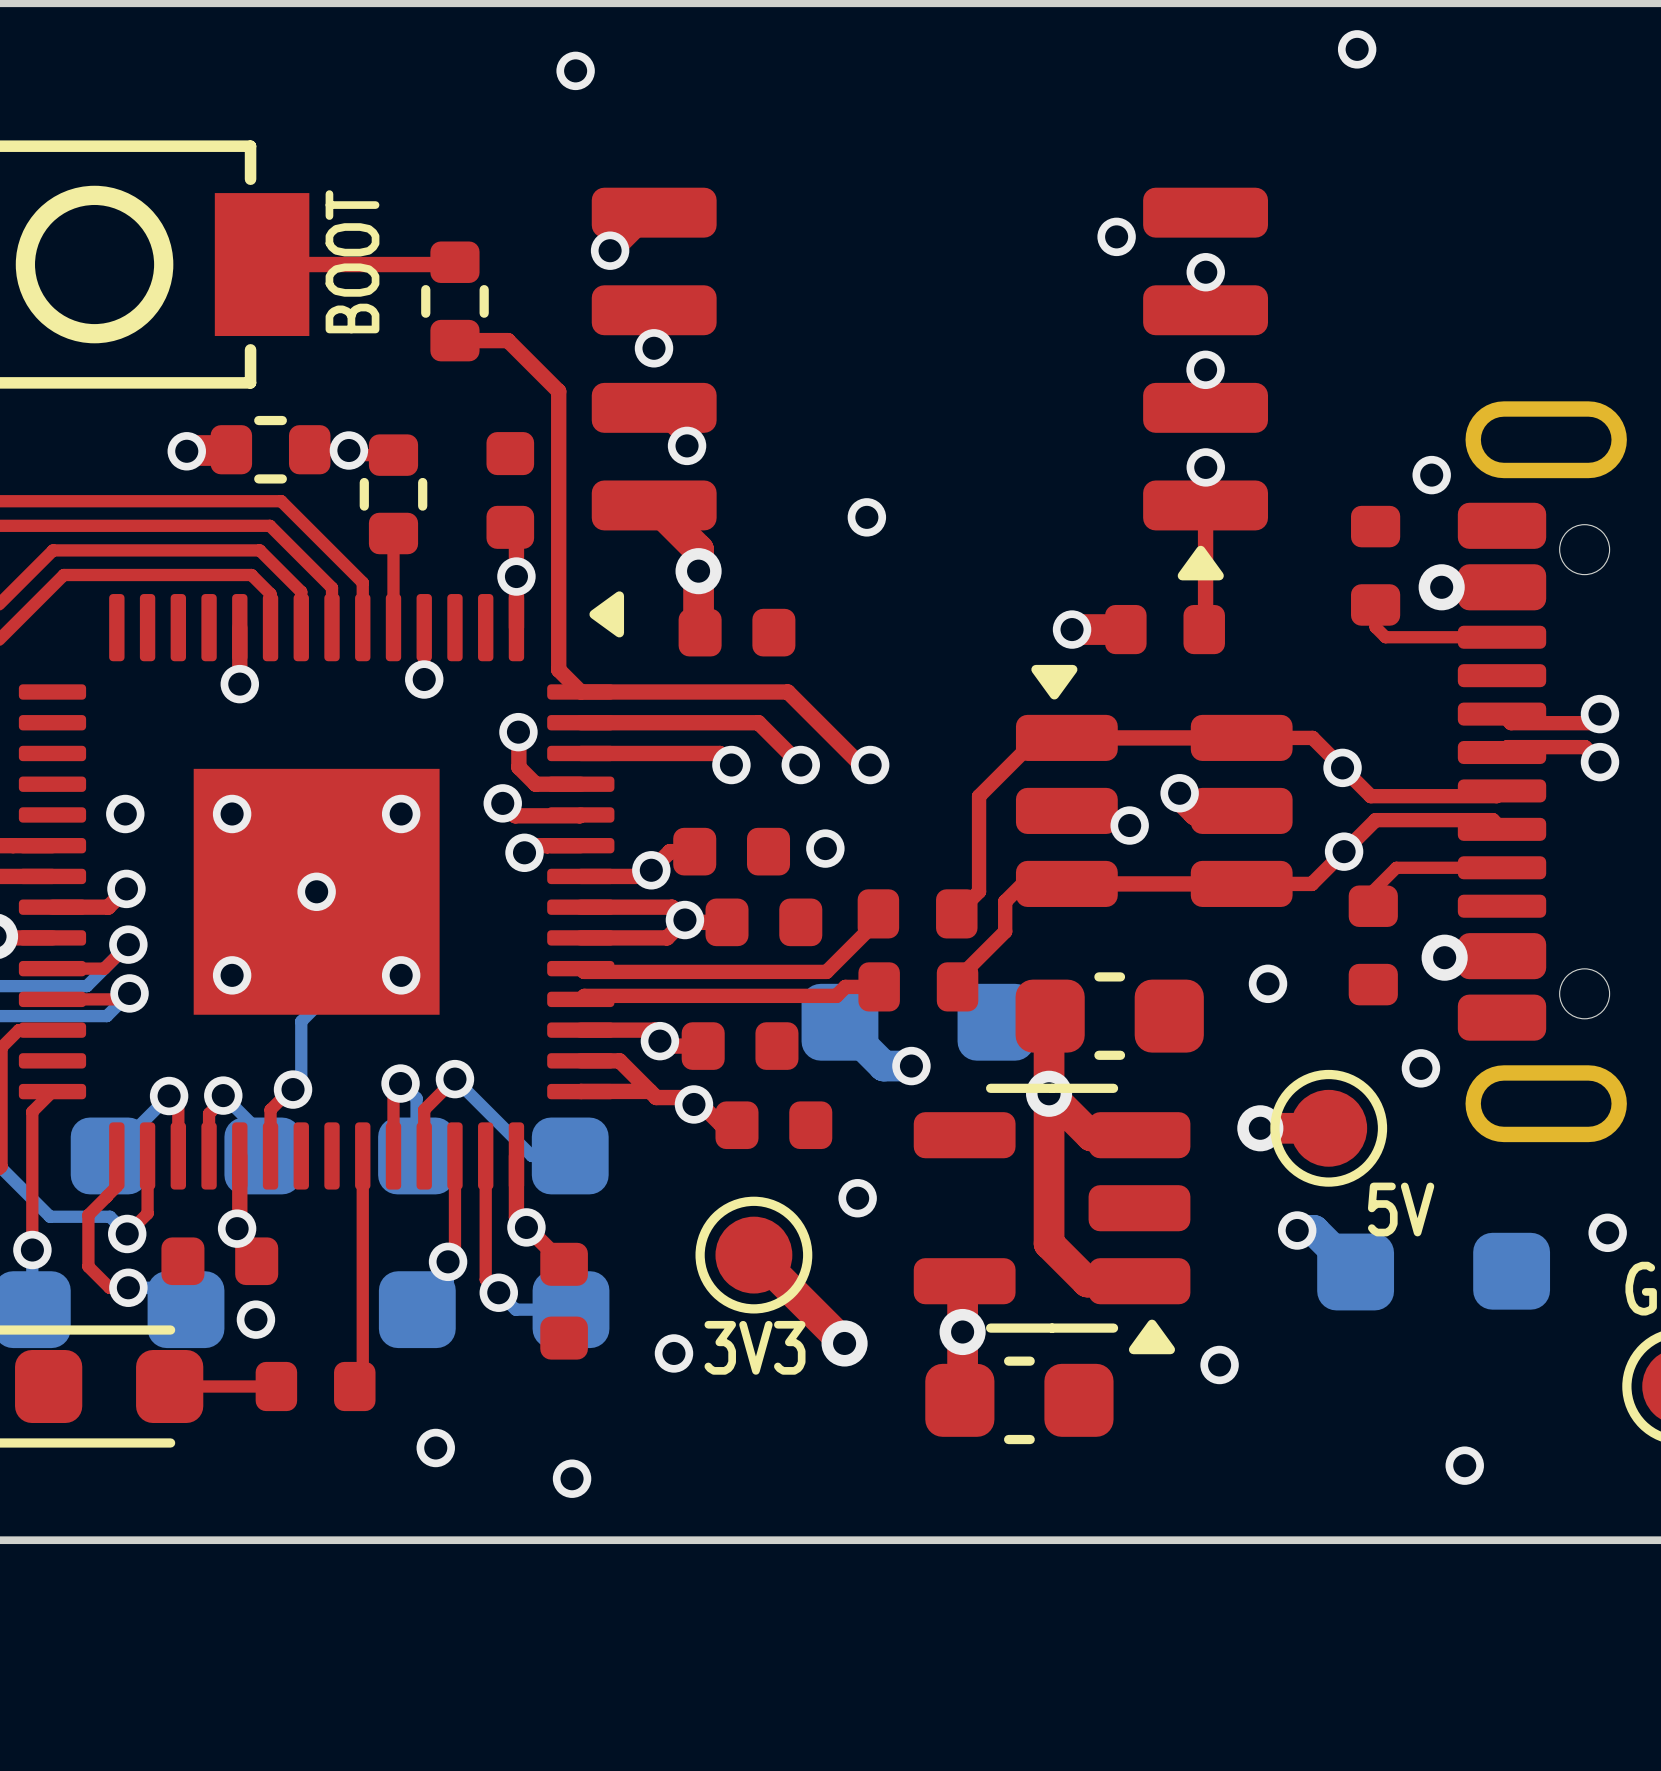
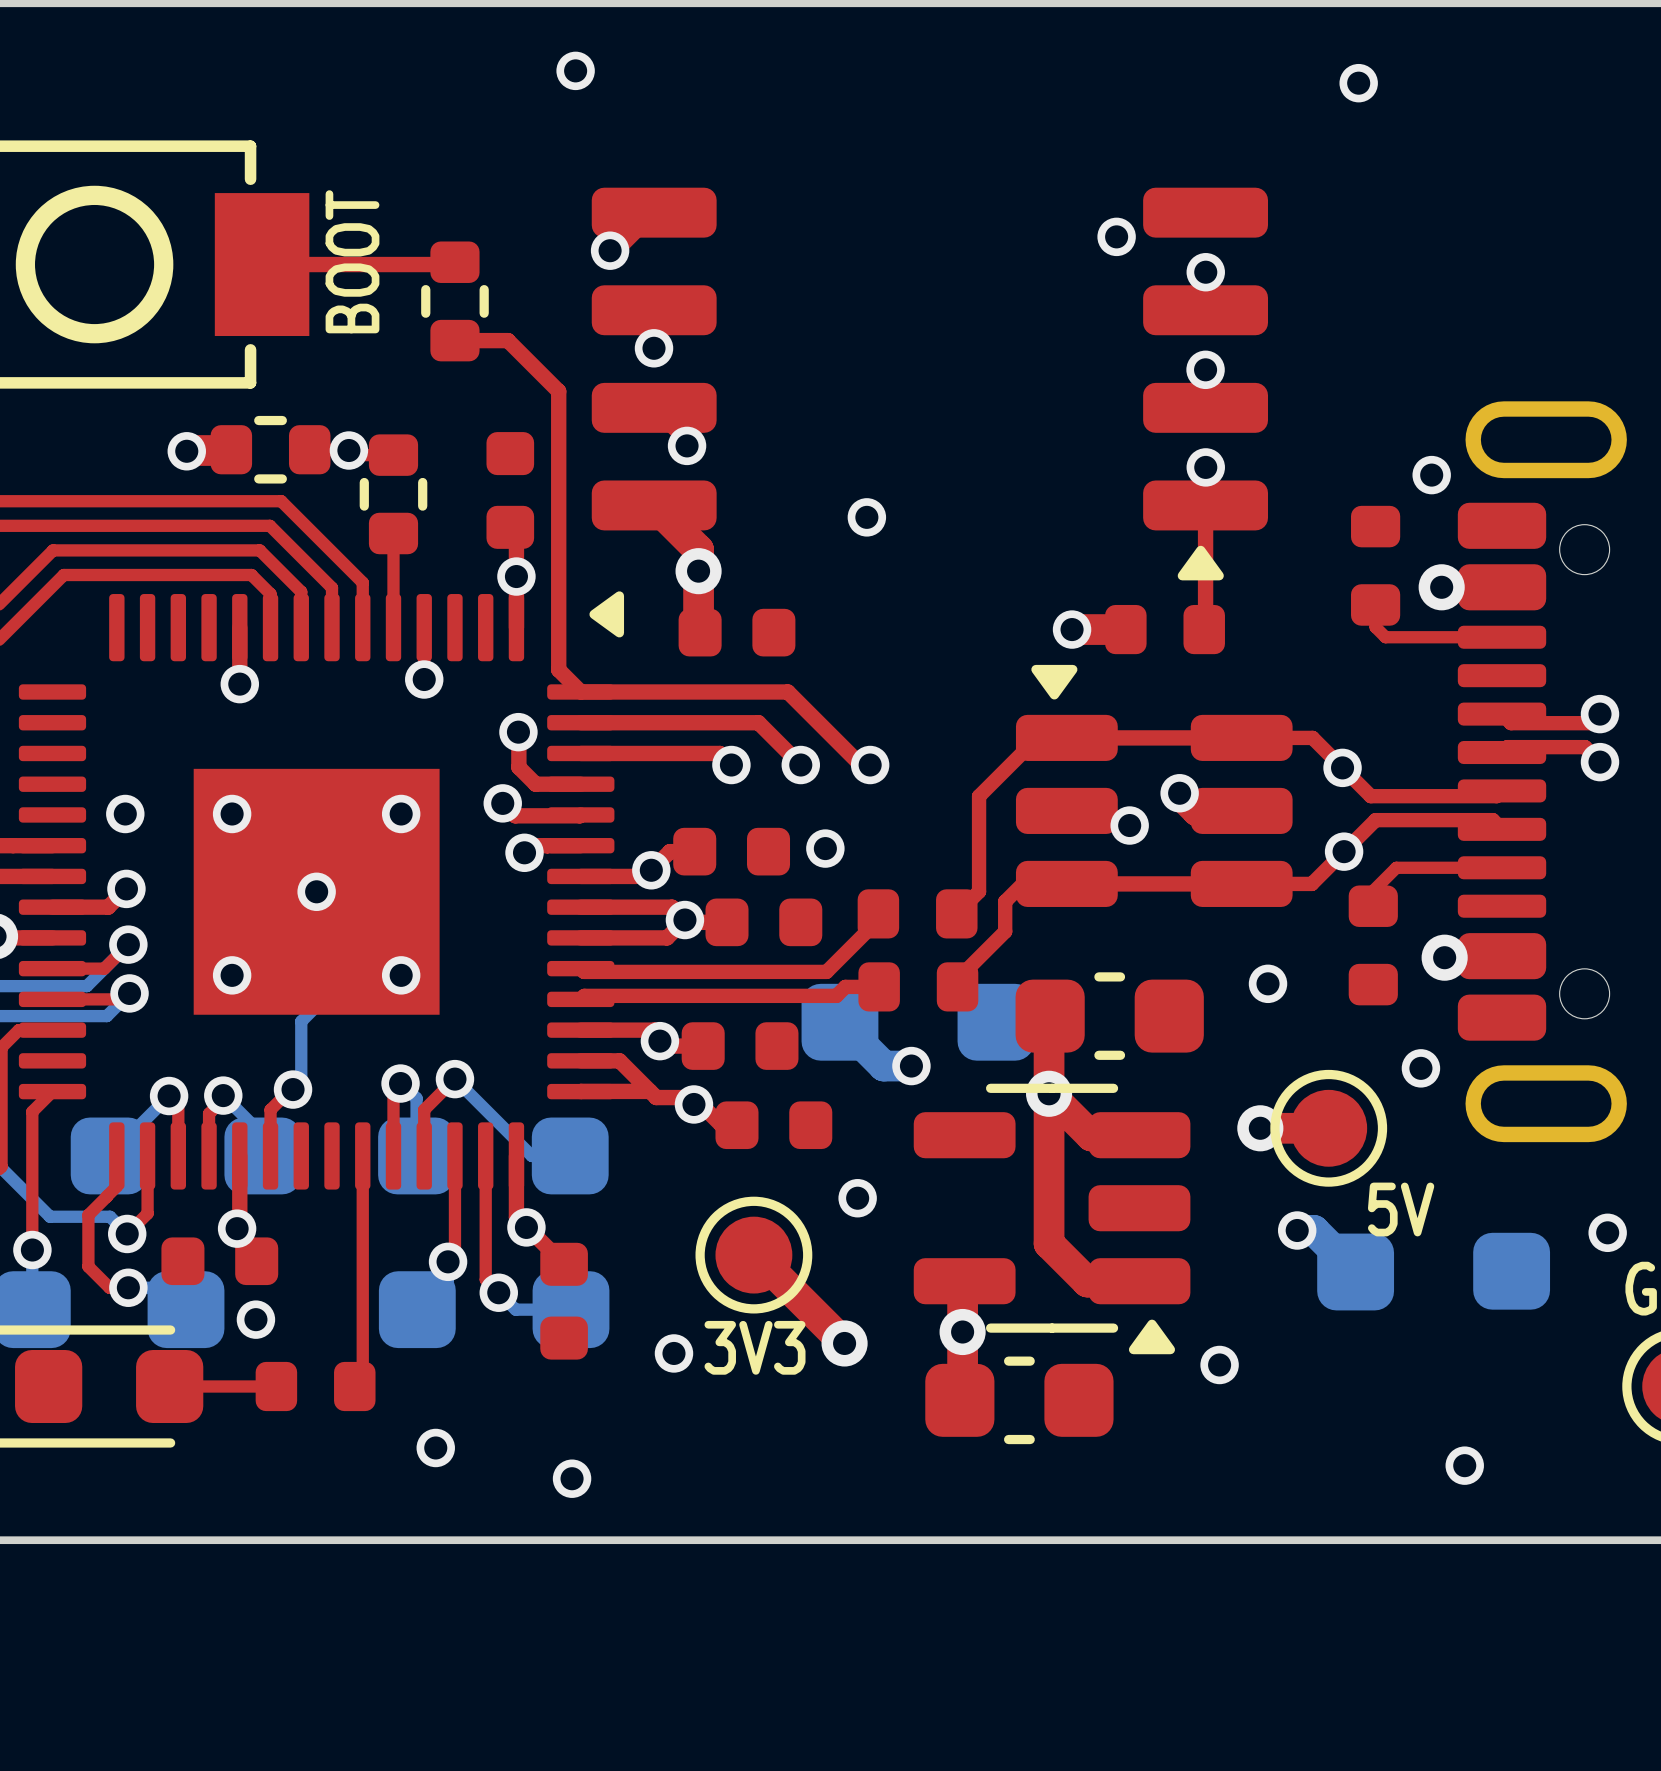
via position: (1357, 49) -> (1358, 83)

